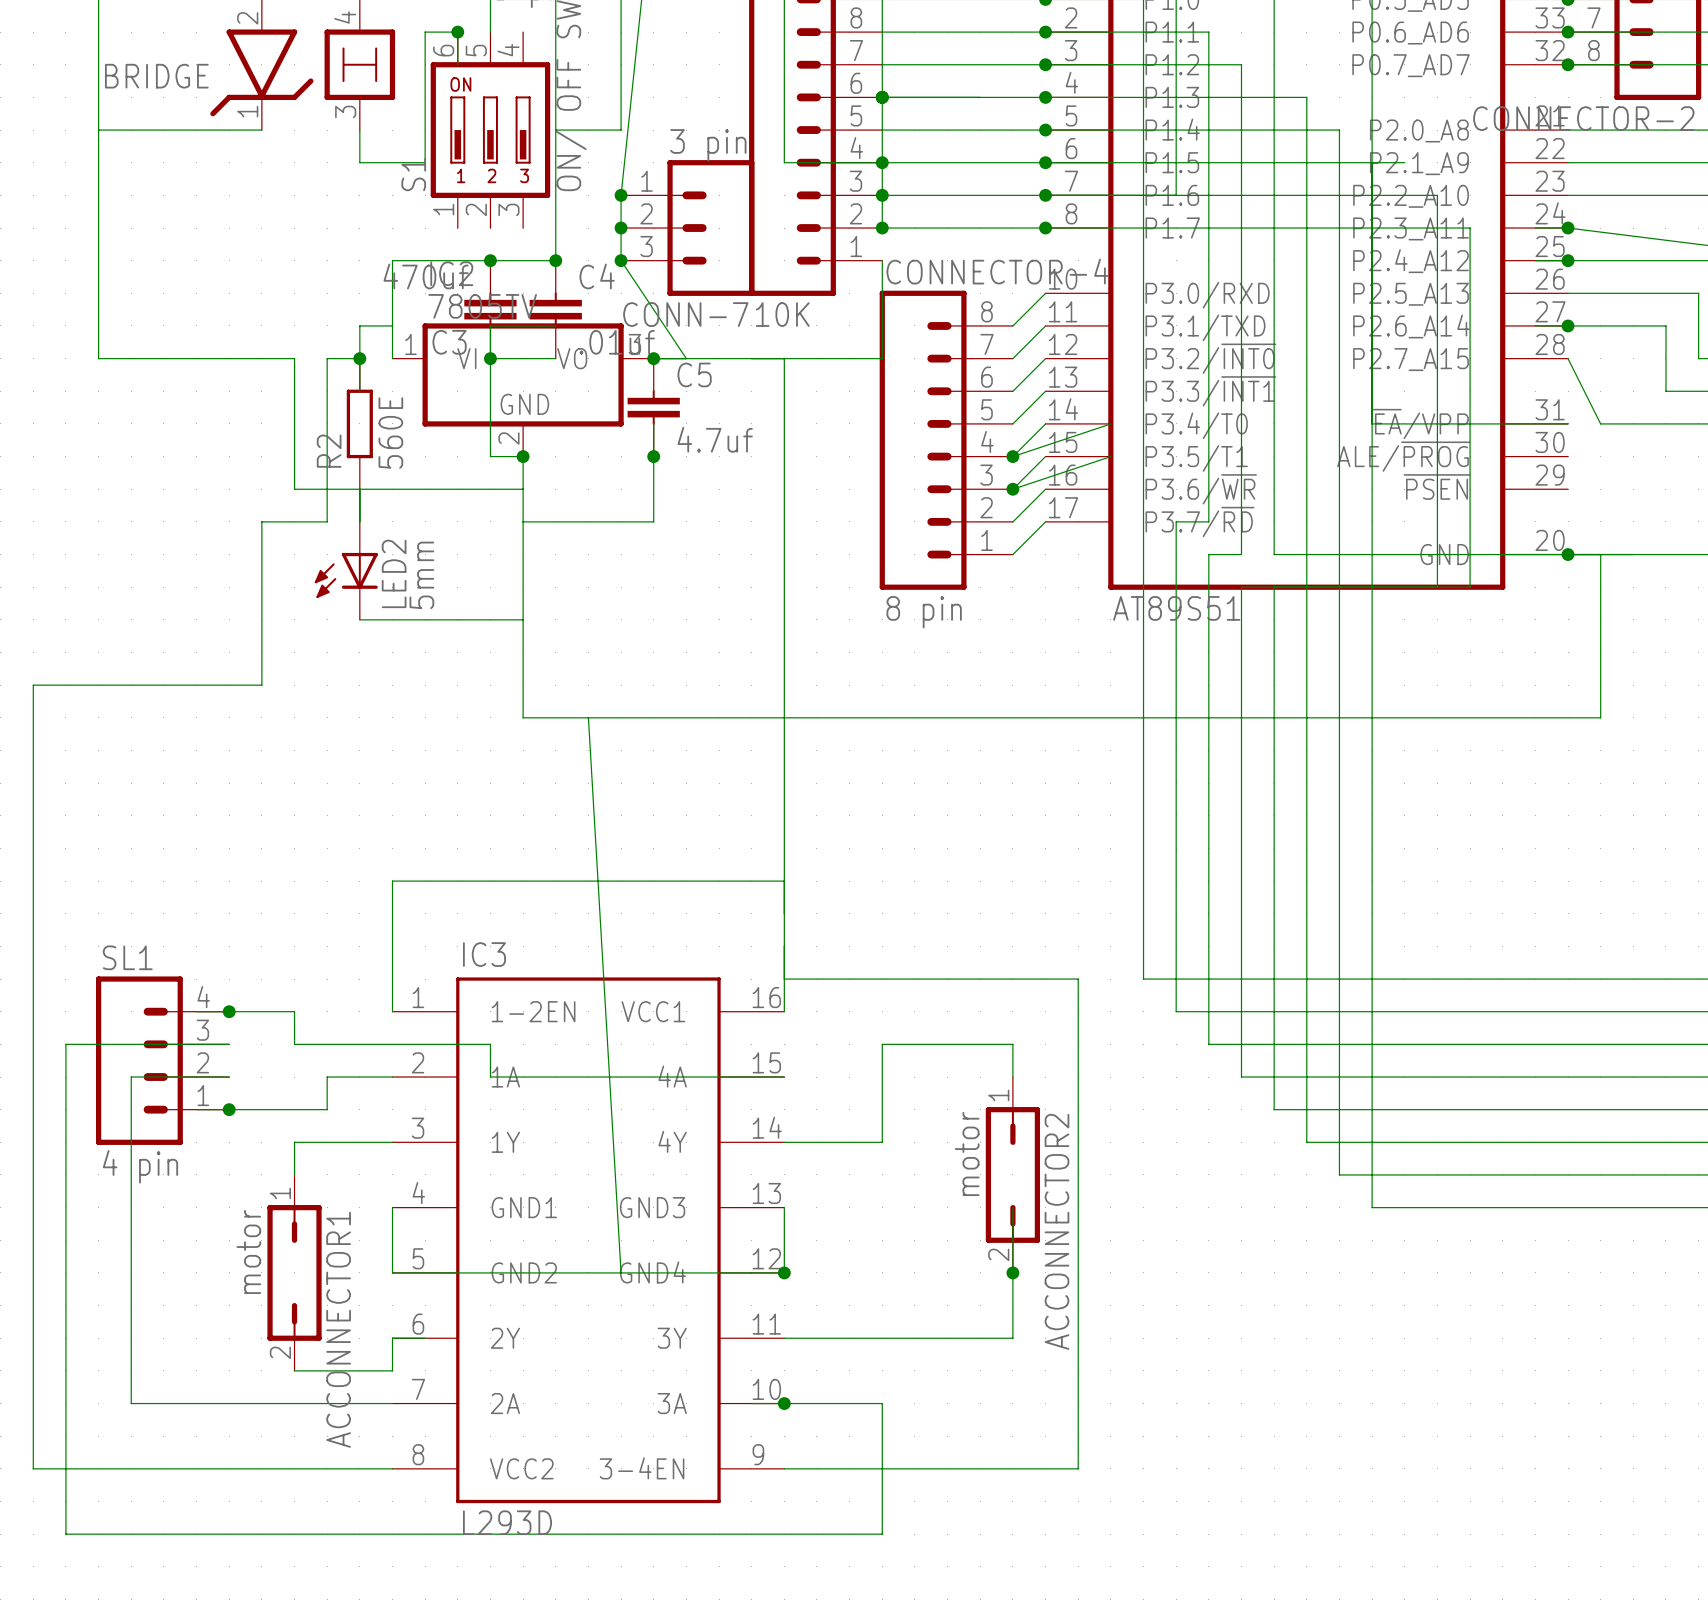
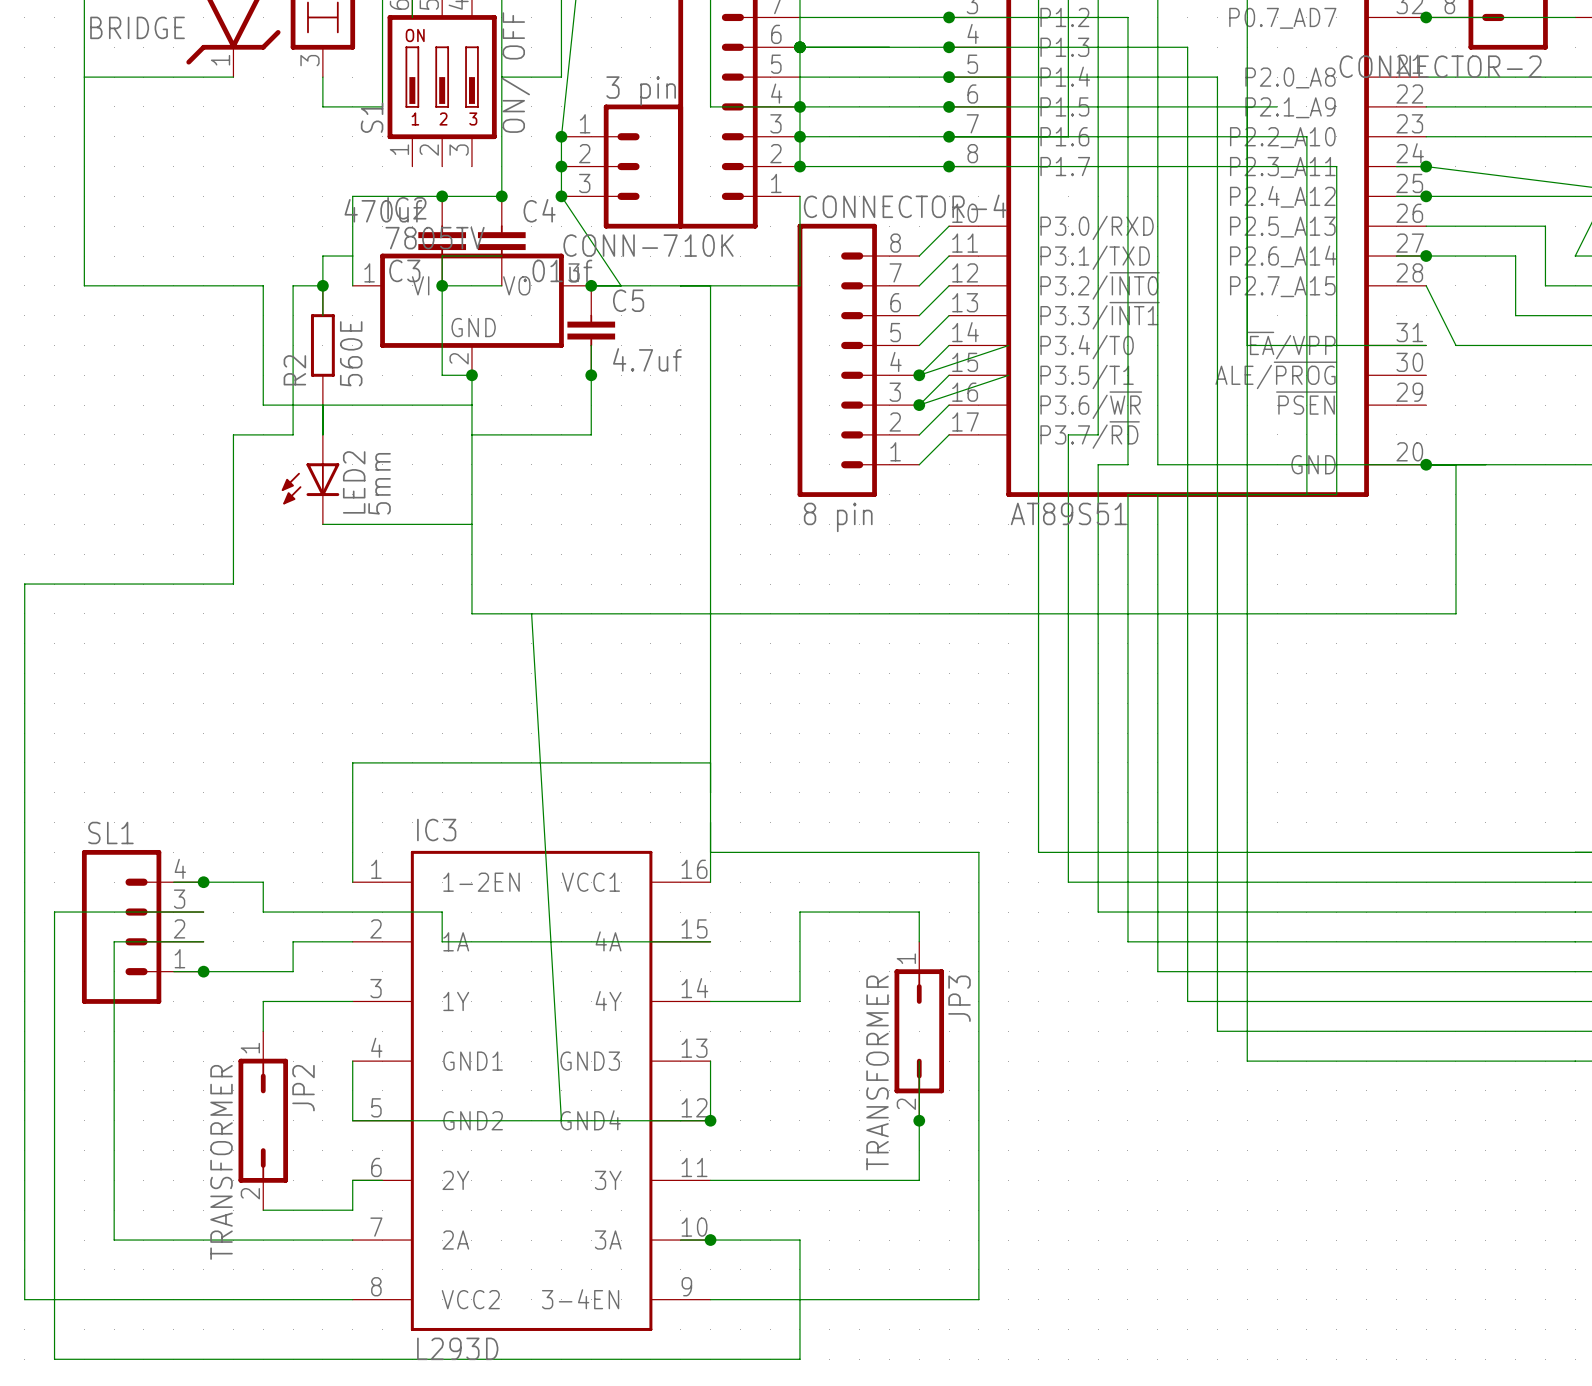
ACCONNECTOR2 value: motor (967, 1153) -> TRANSFORMER (877, 1072)
SL1 value: 4 pin (140, 1166) -> none
ACCONNECTOR2 name: ACCONNECTOR2 (1056, 1231) -> JP3 (959, 998)
ACCONNECTOR1 value: motor (248, 1251) -> TRANSFORMER (221, 1162)
ACCONNECTOR1 name: ACCONNECTOR1 (338, 1329) -> JP2 (303, 1088)

